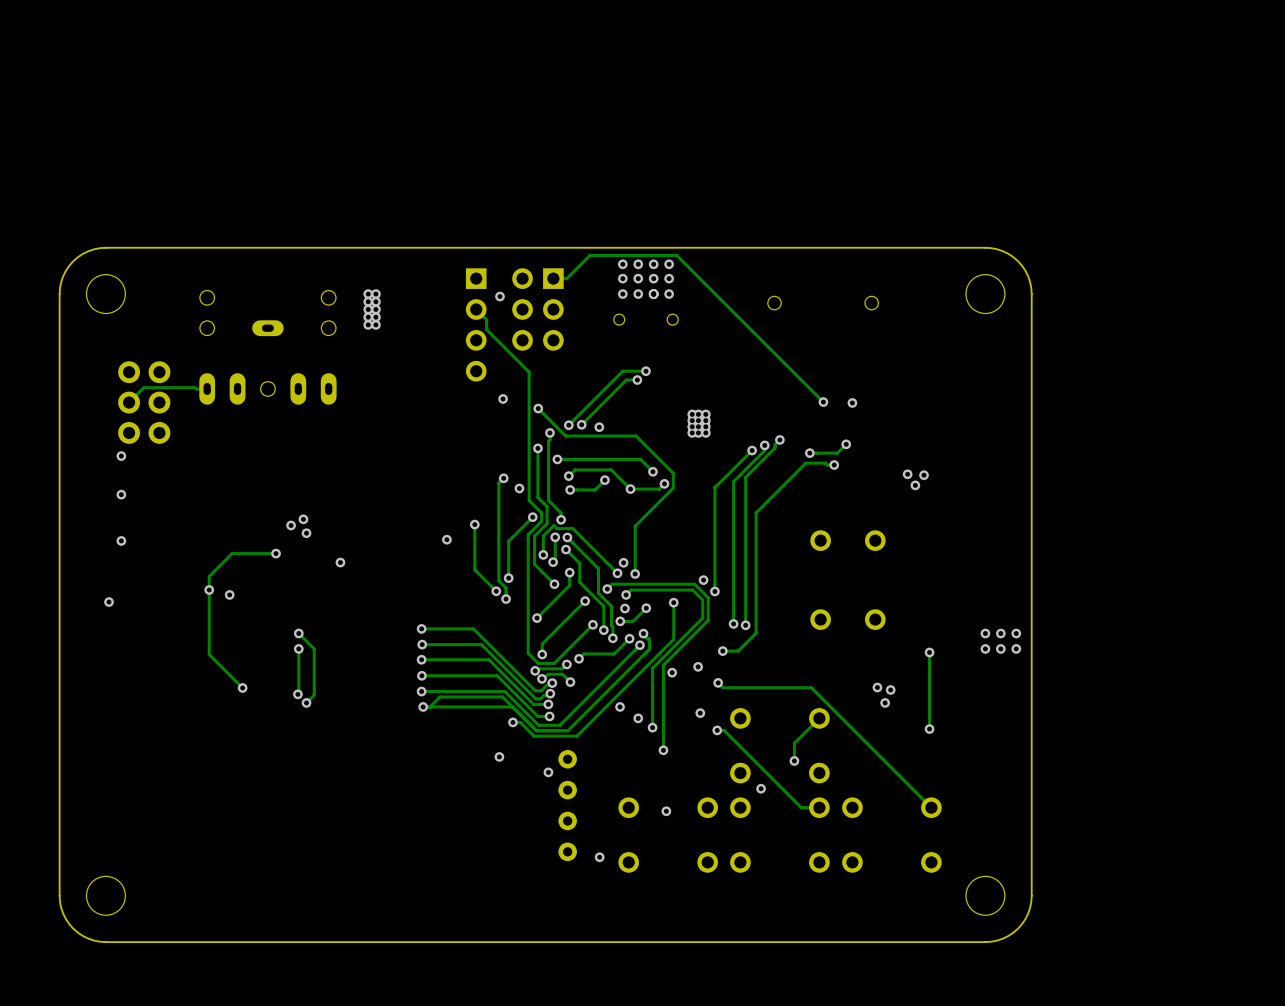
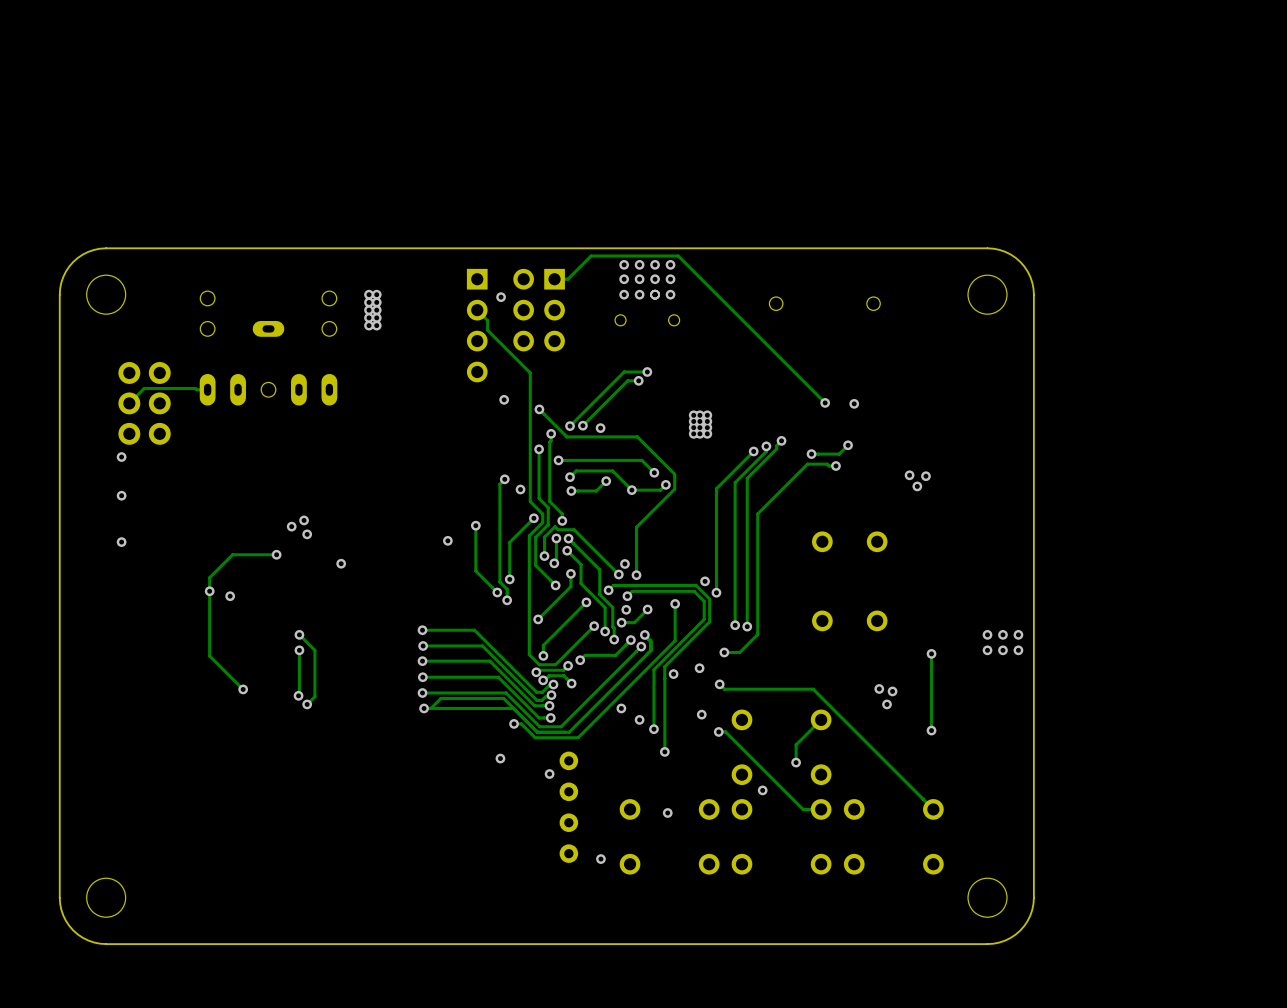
via: (109, 602) -> none

